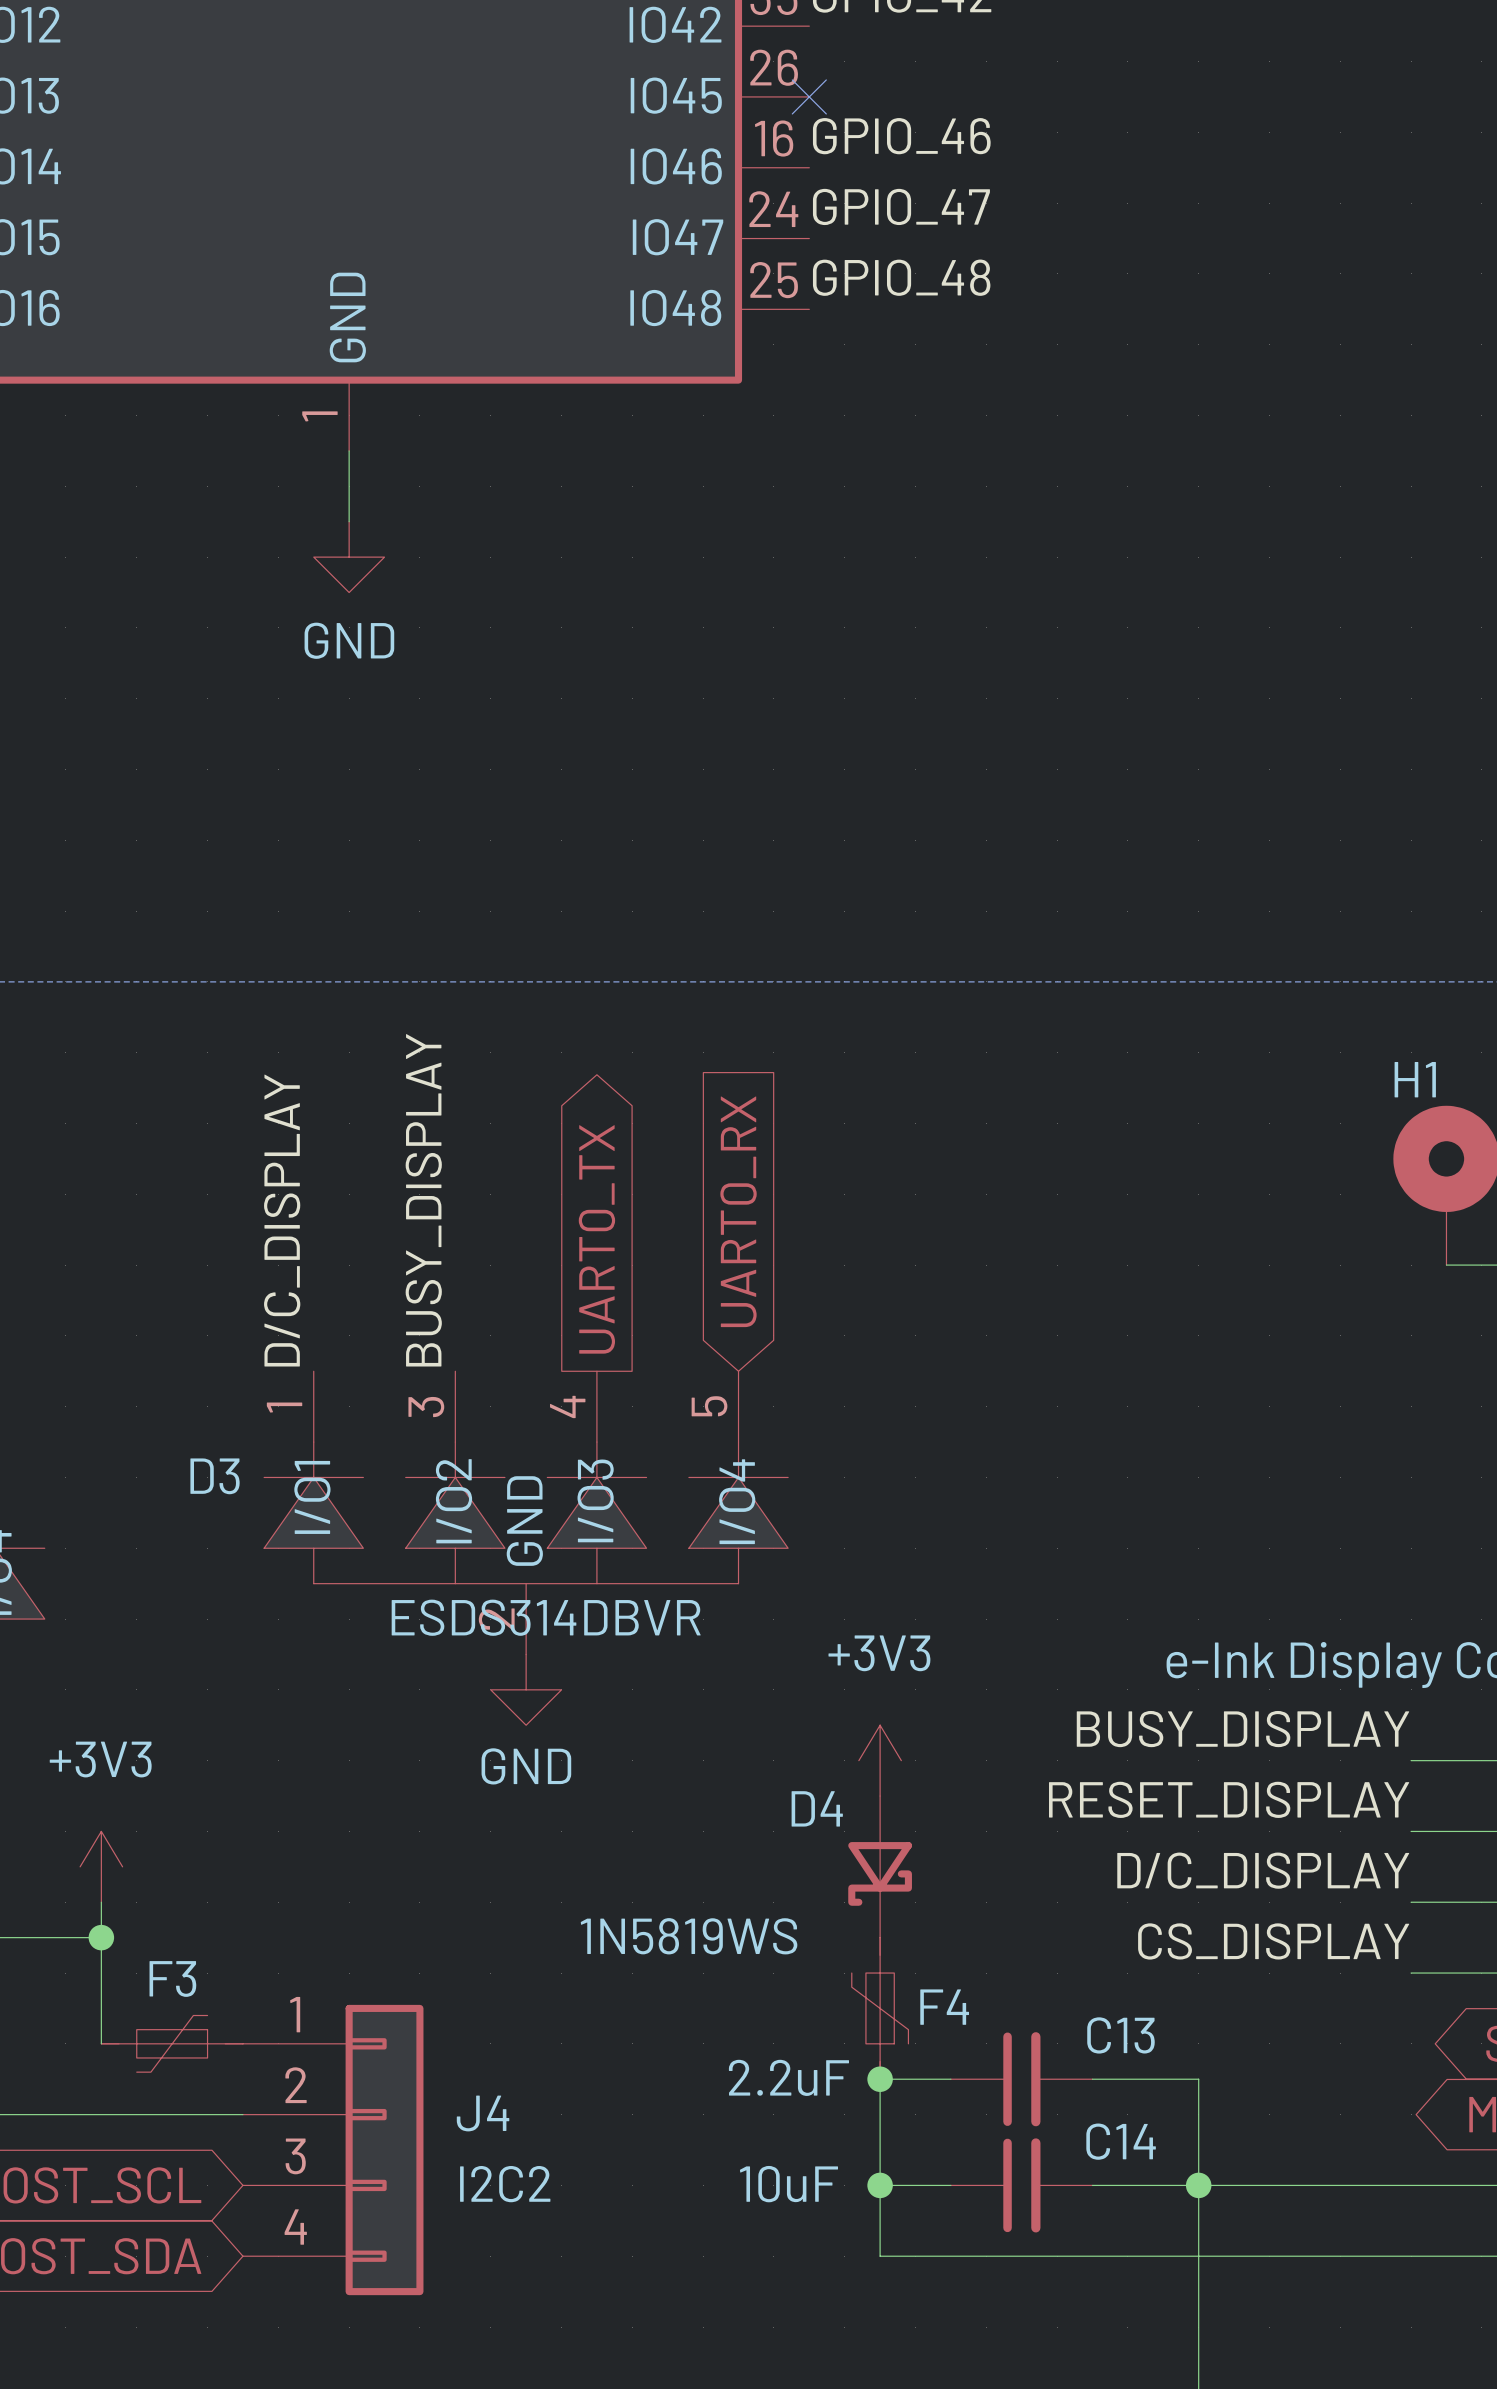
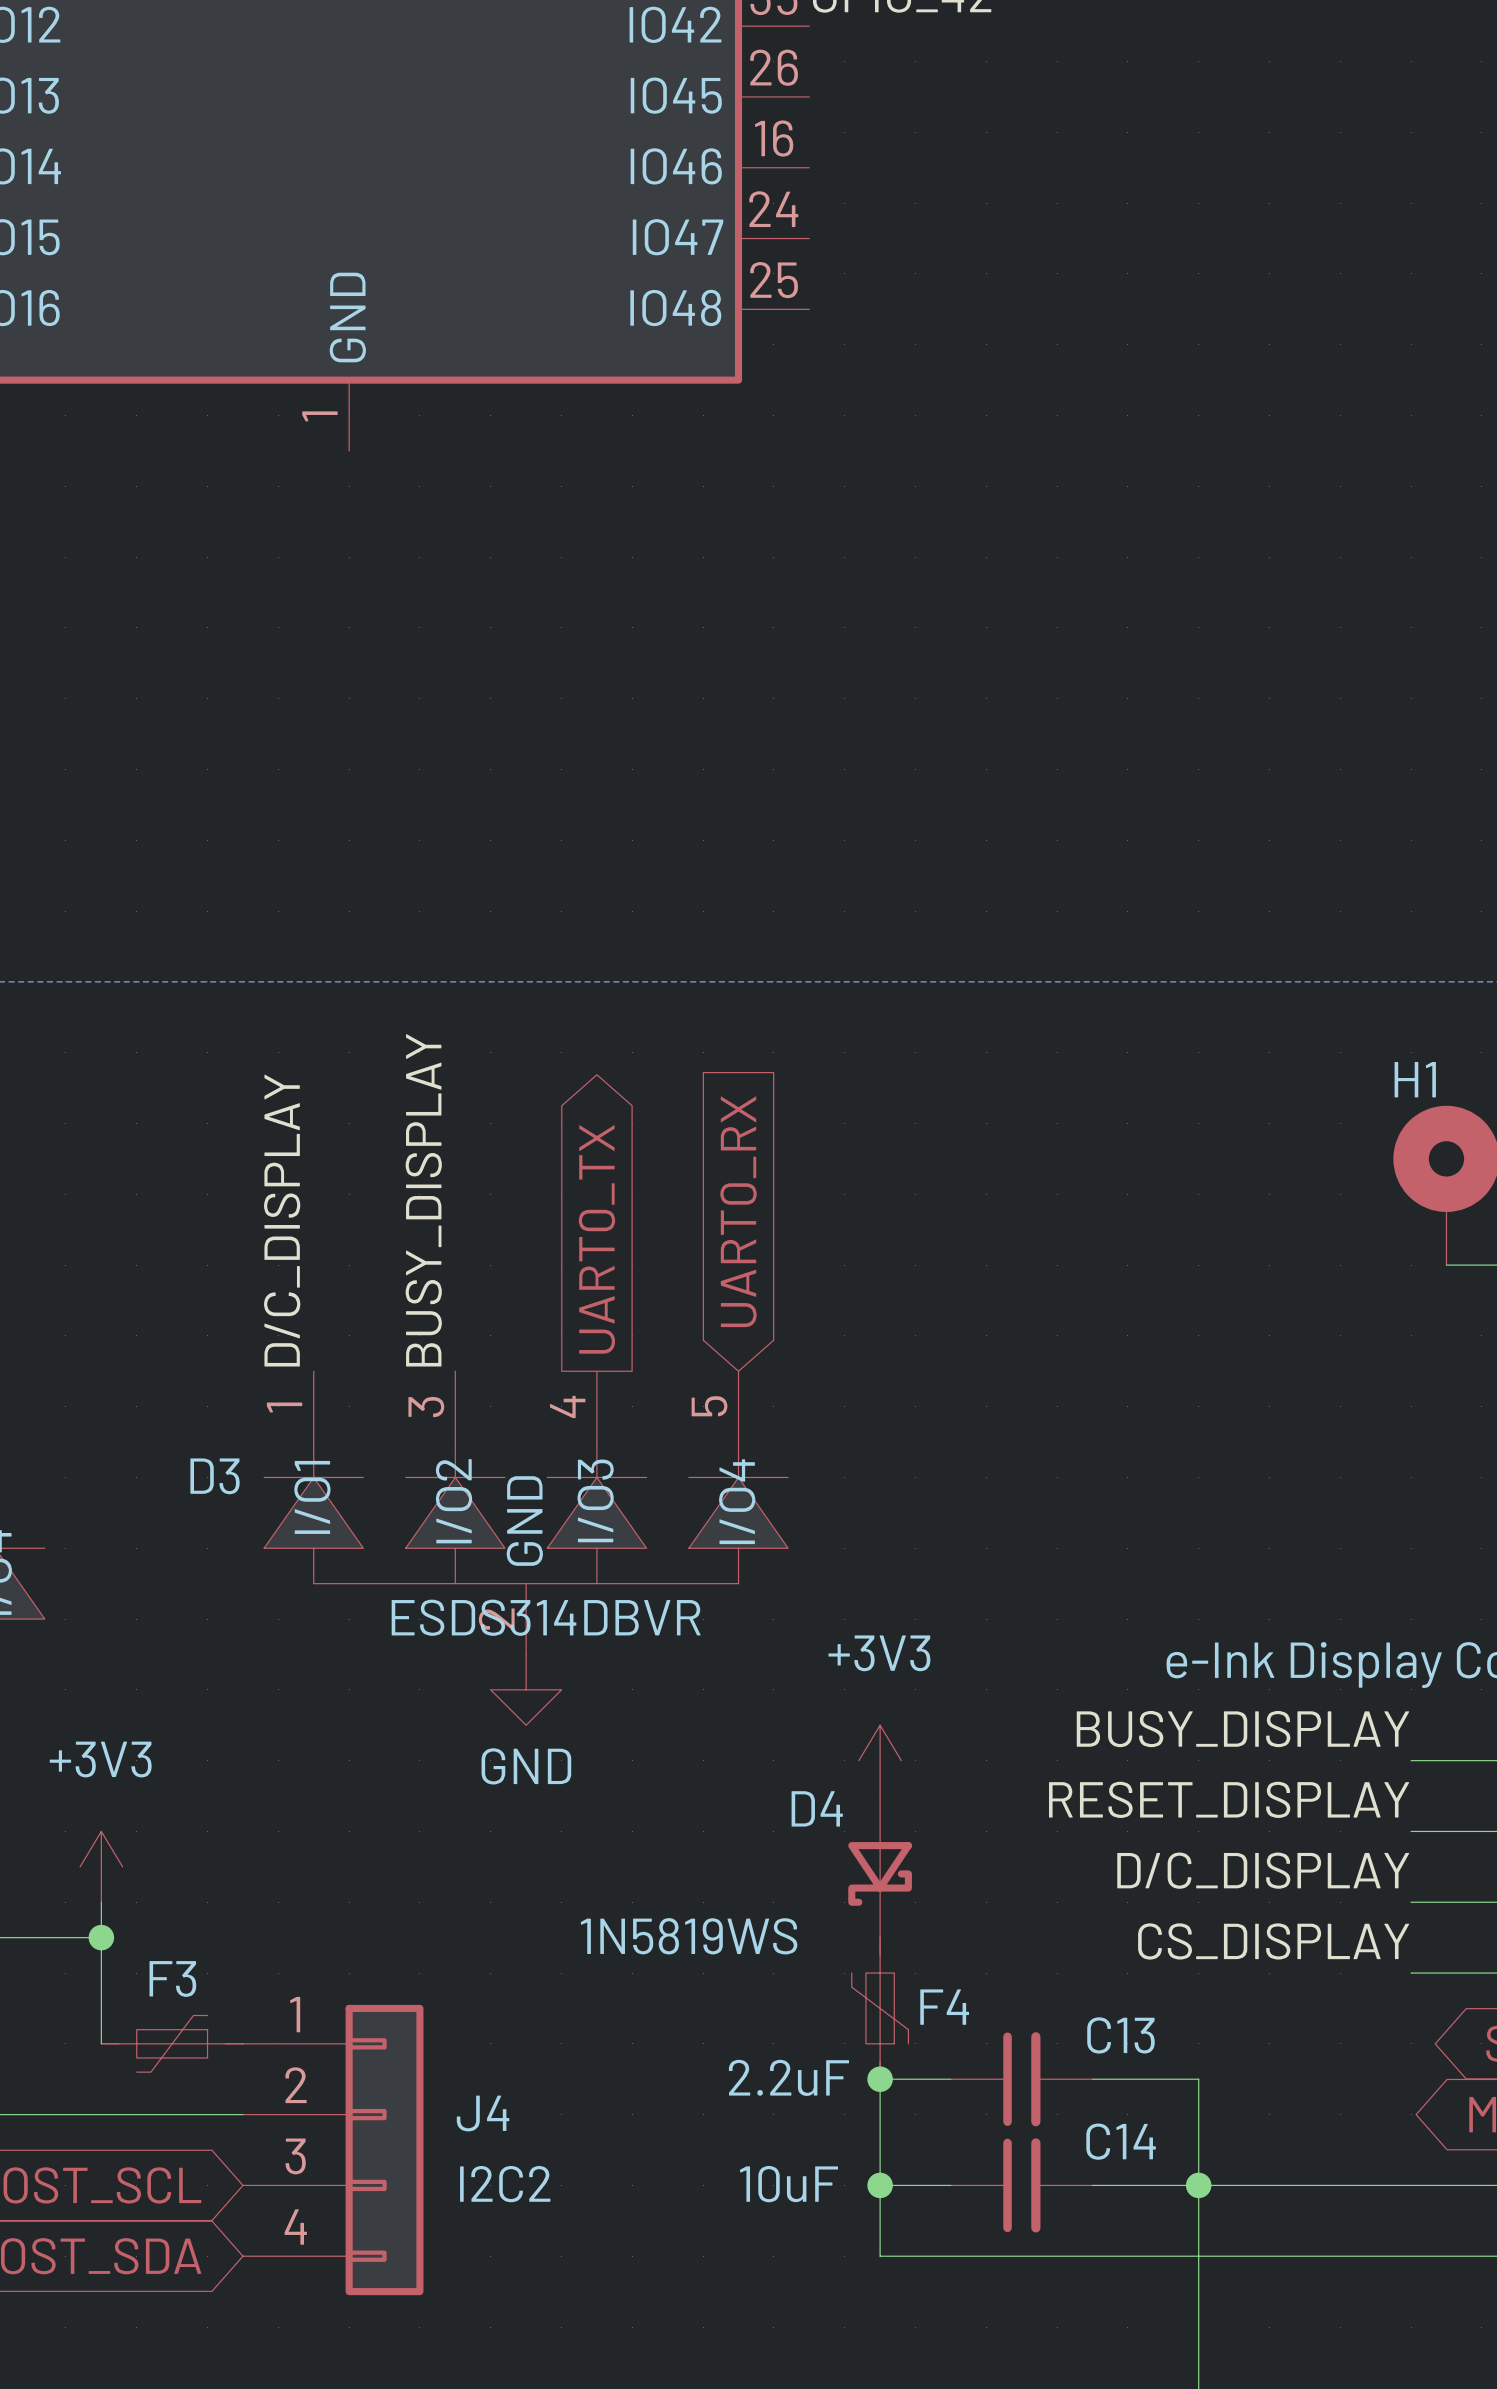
no-connect mark: (809, 96) -> none
label: GPIO_46 (901, 136) -> none
label: GPIO_47 (901, 206) -> none
label: GPIO_48 (901, 277) -> none
wire: (349, 450) (349, 521) -> none
power symbol: GND (349, 557) -> none

